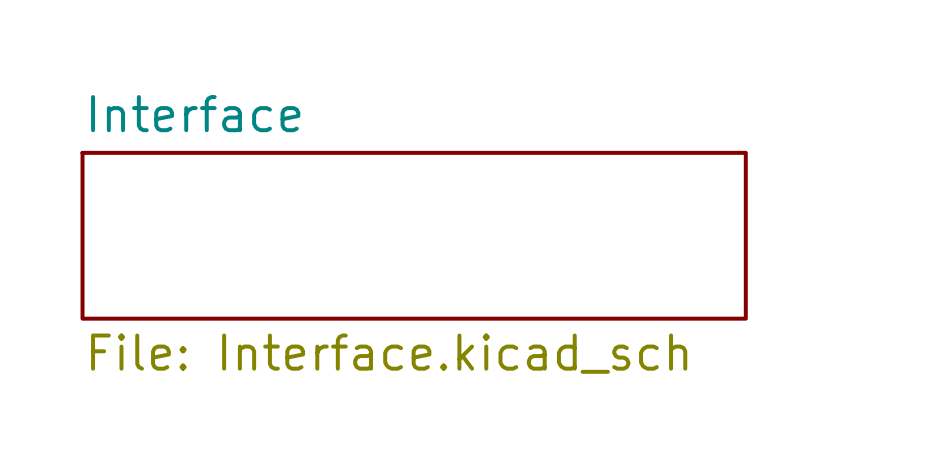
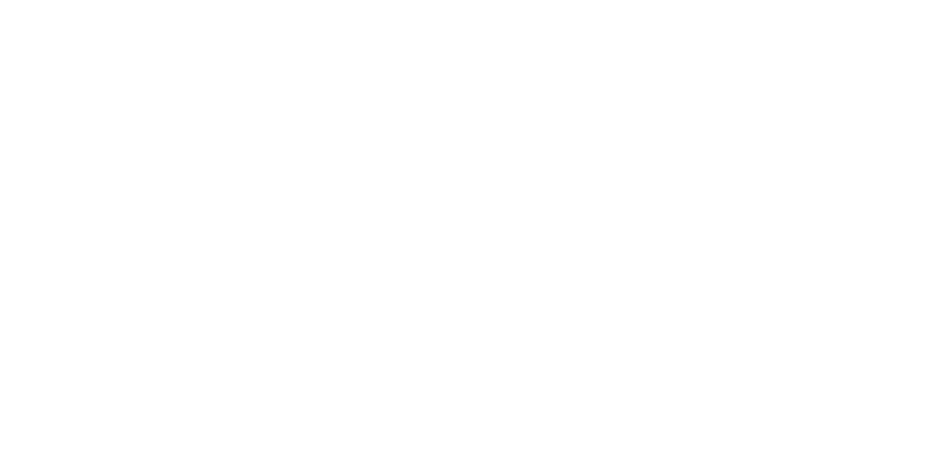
sheet Interface: File: Interface.kicad_sch (414, 235) -> none

